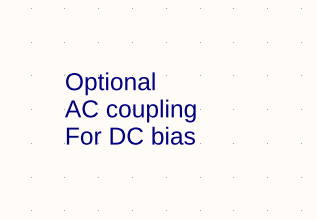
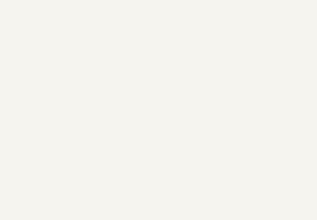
text: Optional (110, 83) -> none
text: AC coupling (130, 111) -> none
text: For DC bias (130, 135) -> none

